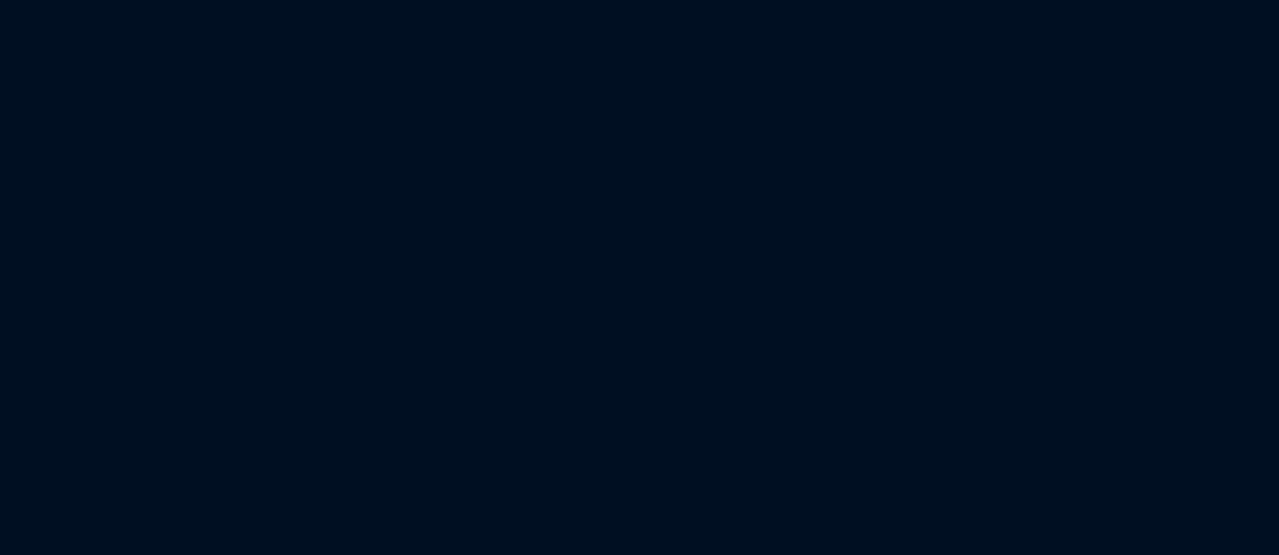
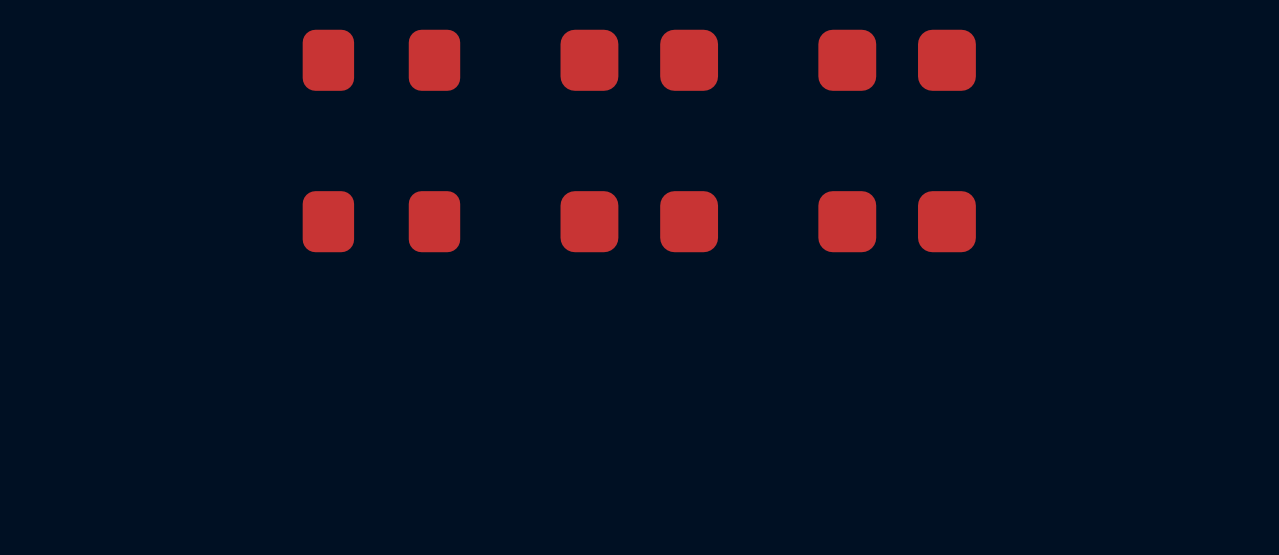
part: none -> (381, 60)
part: none -> (639, 60)
part: none -> (897, 60)
part: none -> (381, 221)
part: none -> (639, 221)
part: none -> (897, 221)

